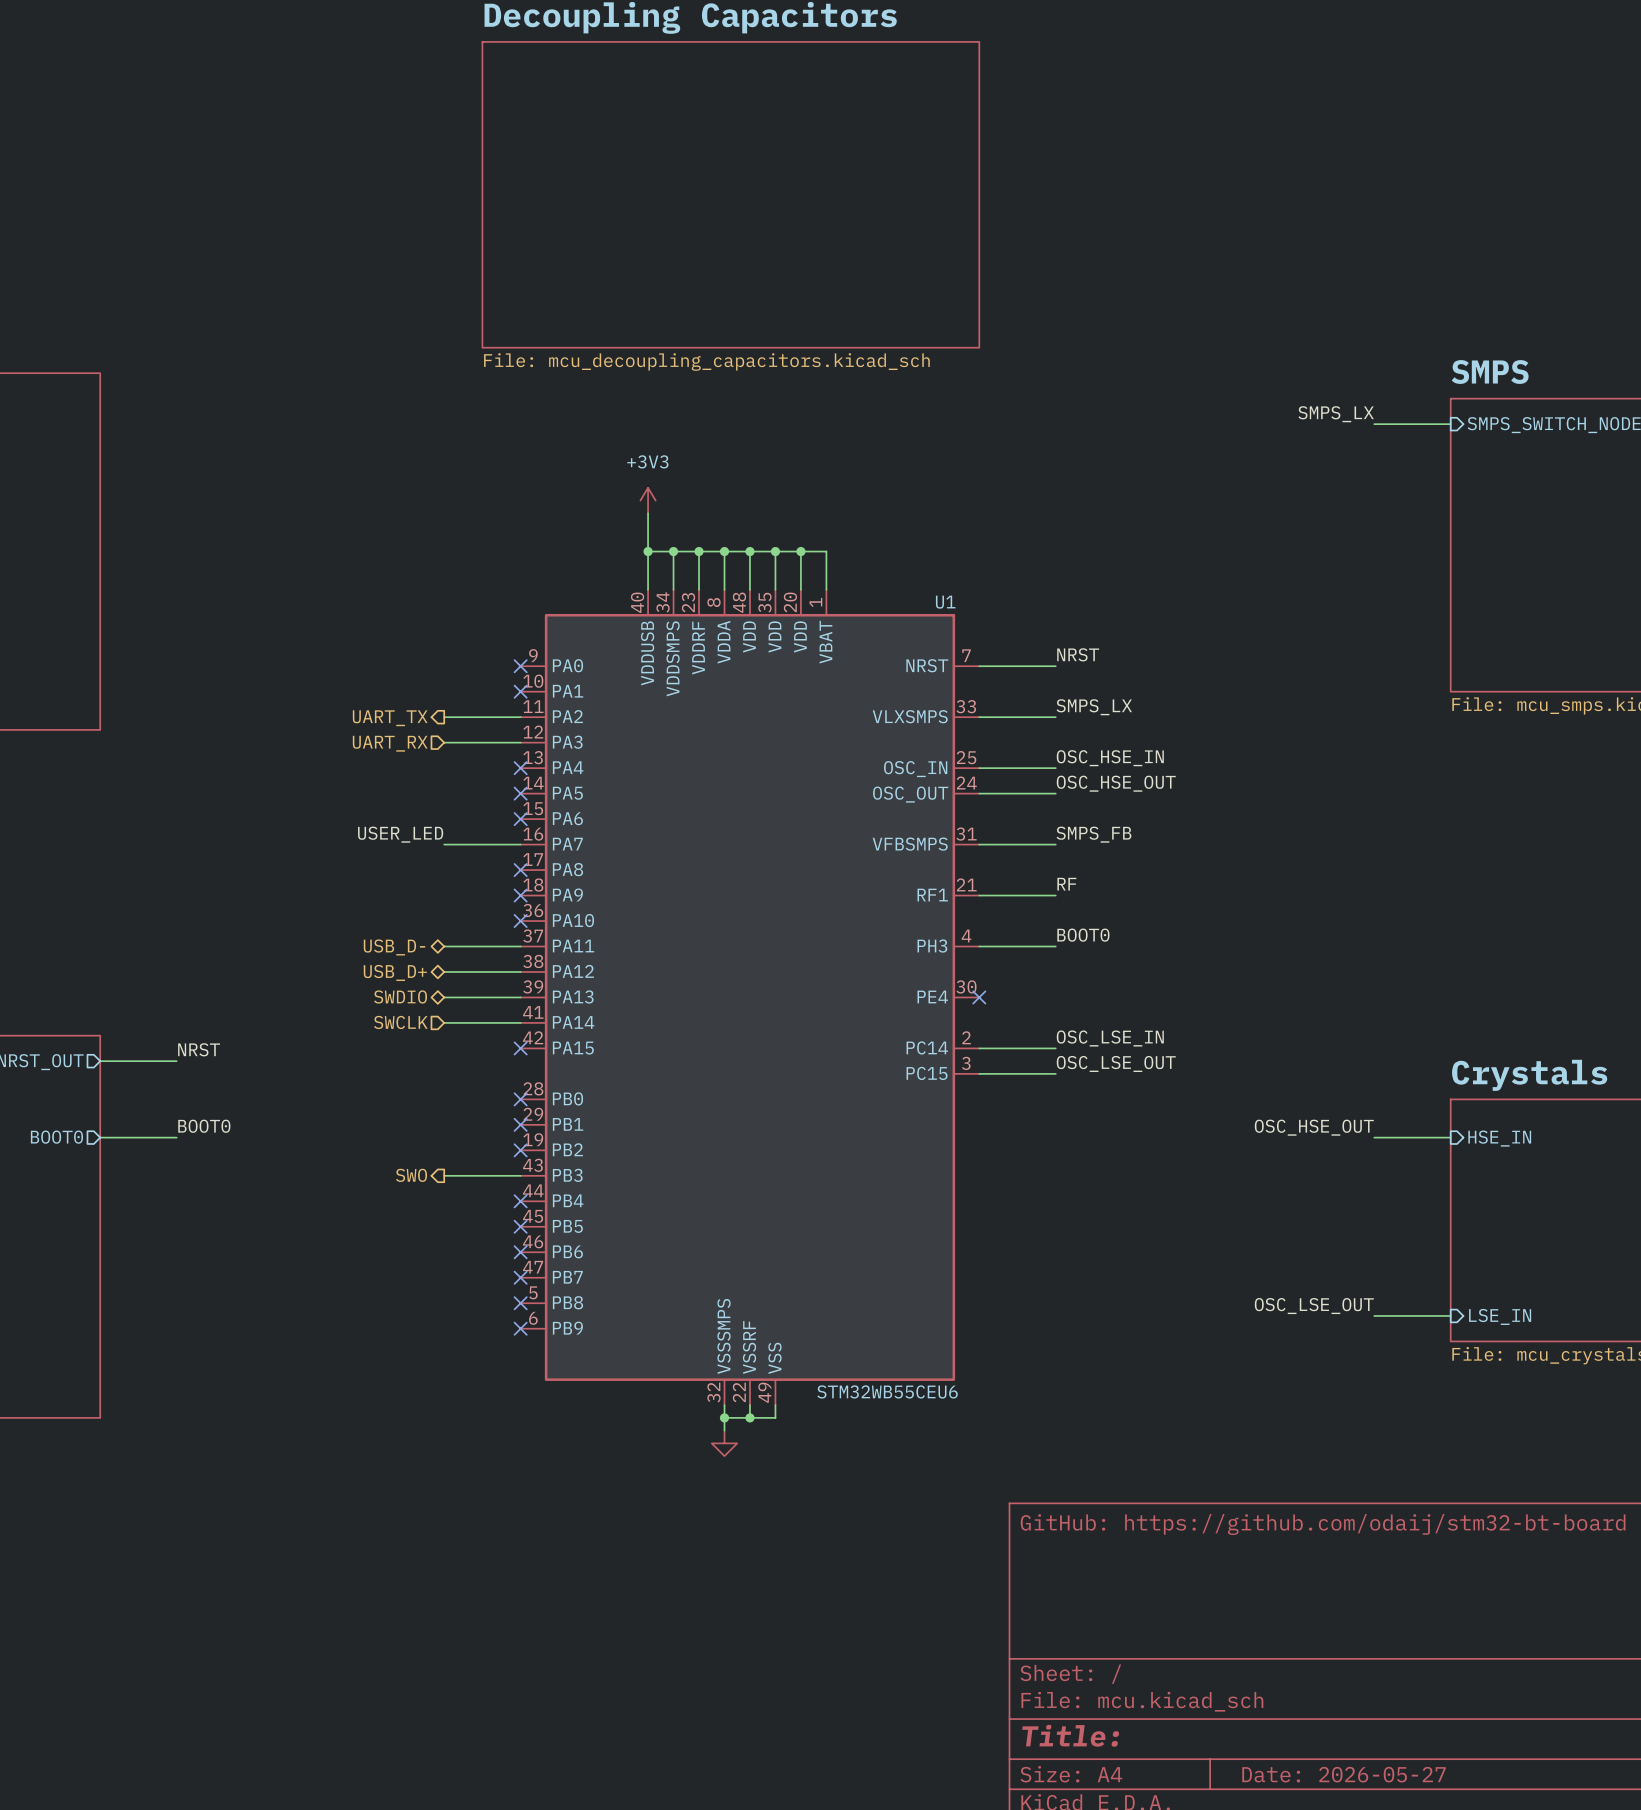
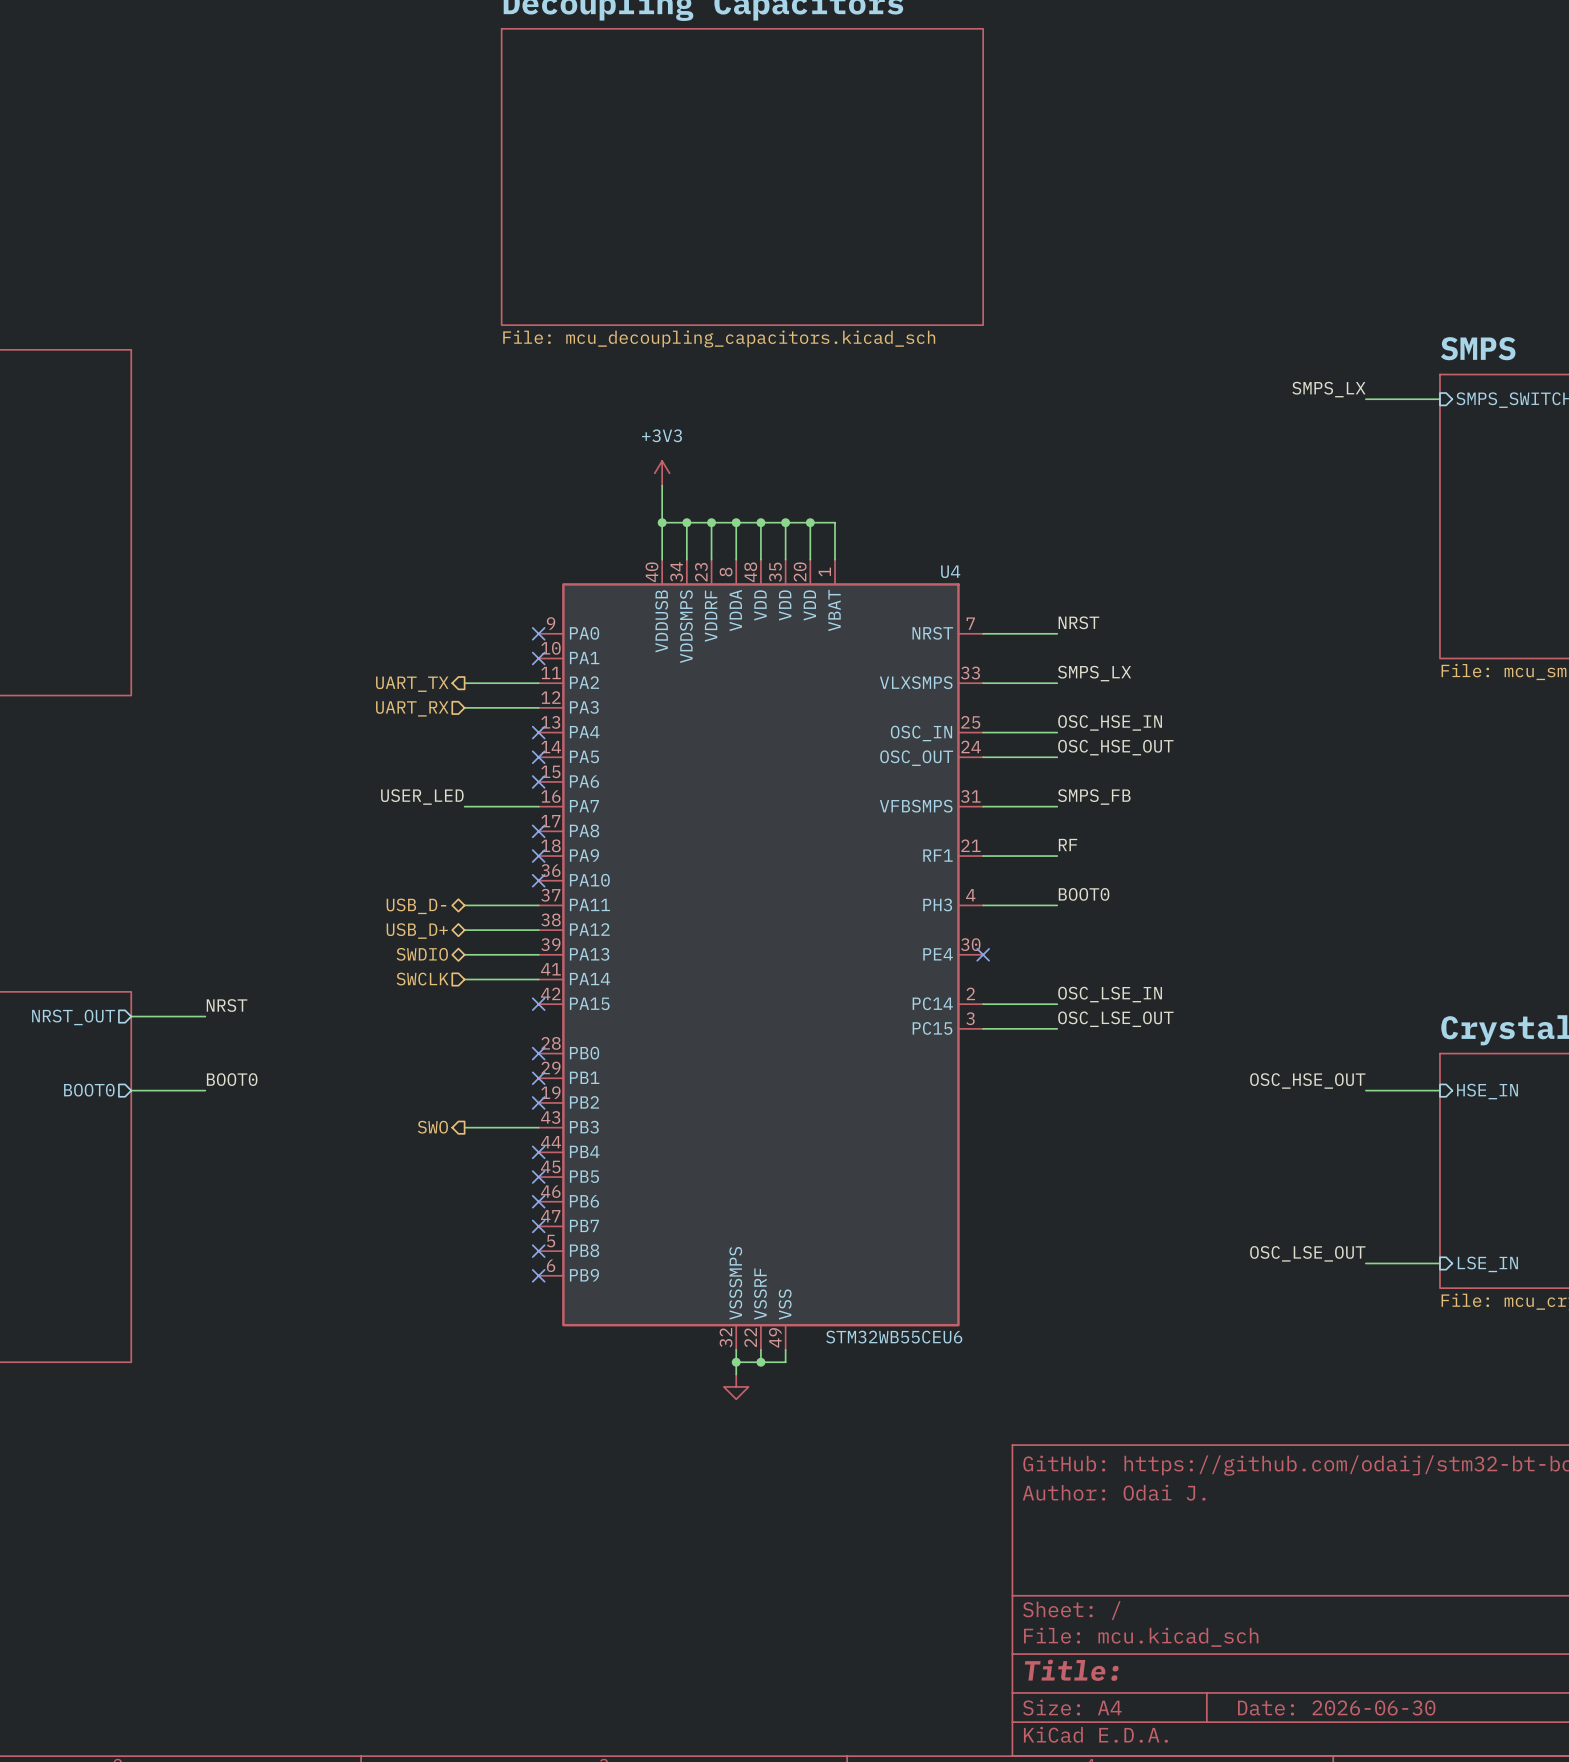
U1 name: U1 (945, 602) -> U4 (950, 571)
title block: none -> Author: Odai J. (1114, 1492)
title block: Date: 2026-05-27 (1343, 1774) -> Date: 2026-06-30 (1336, 1707)

